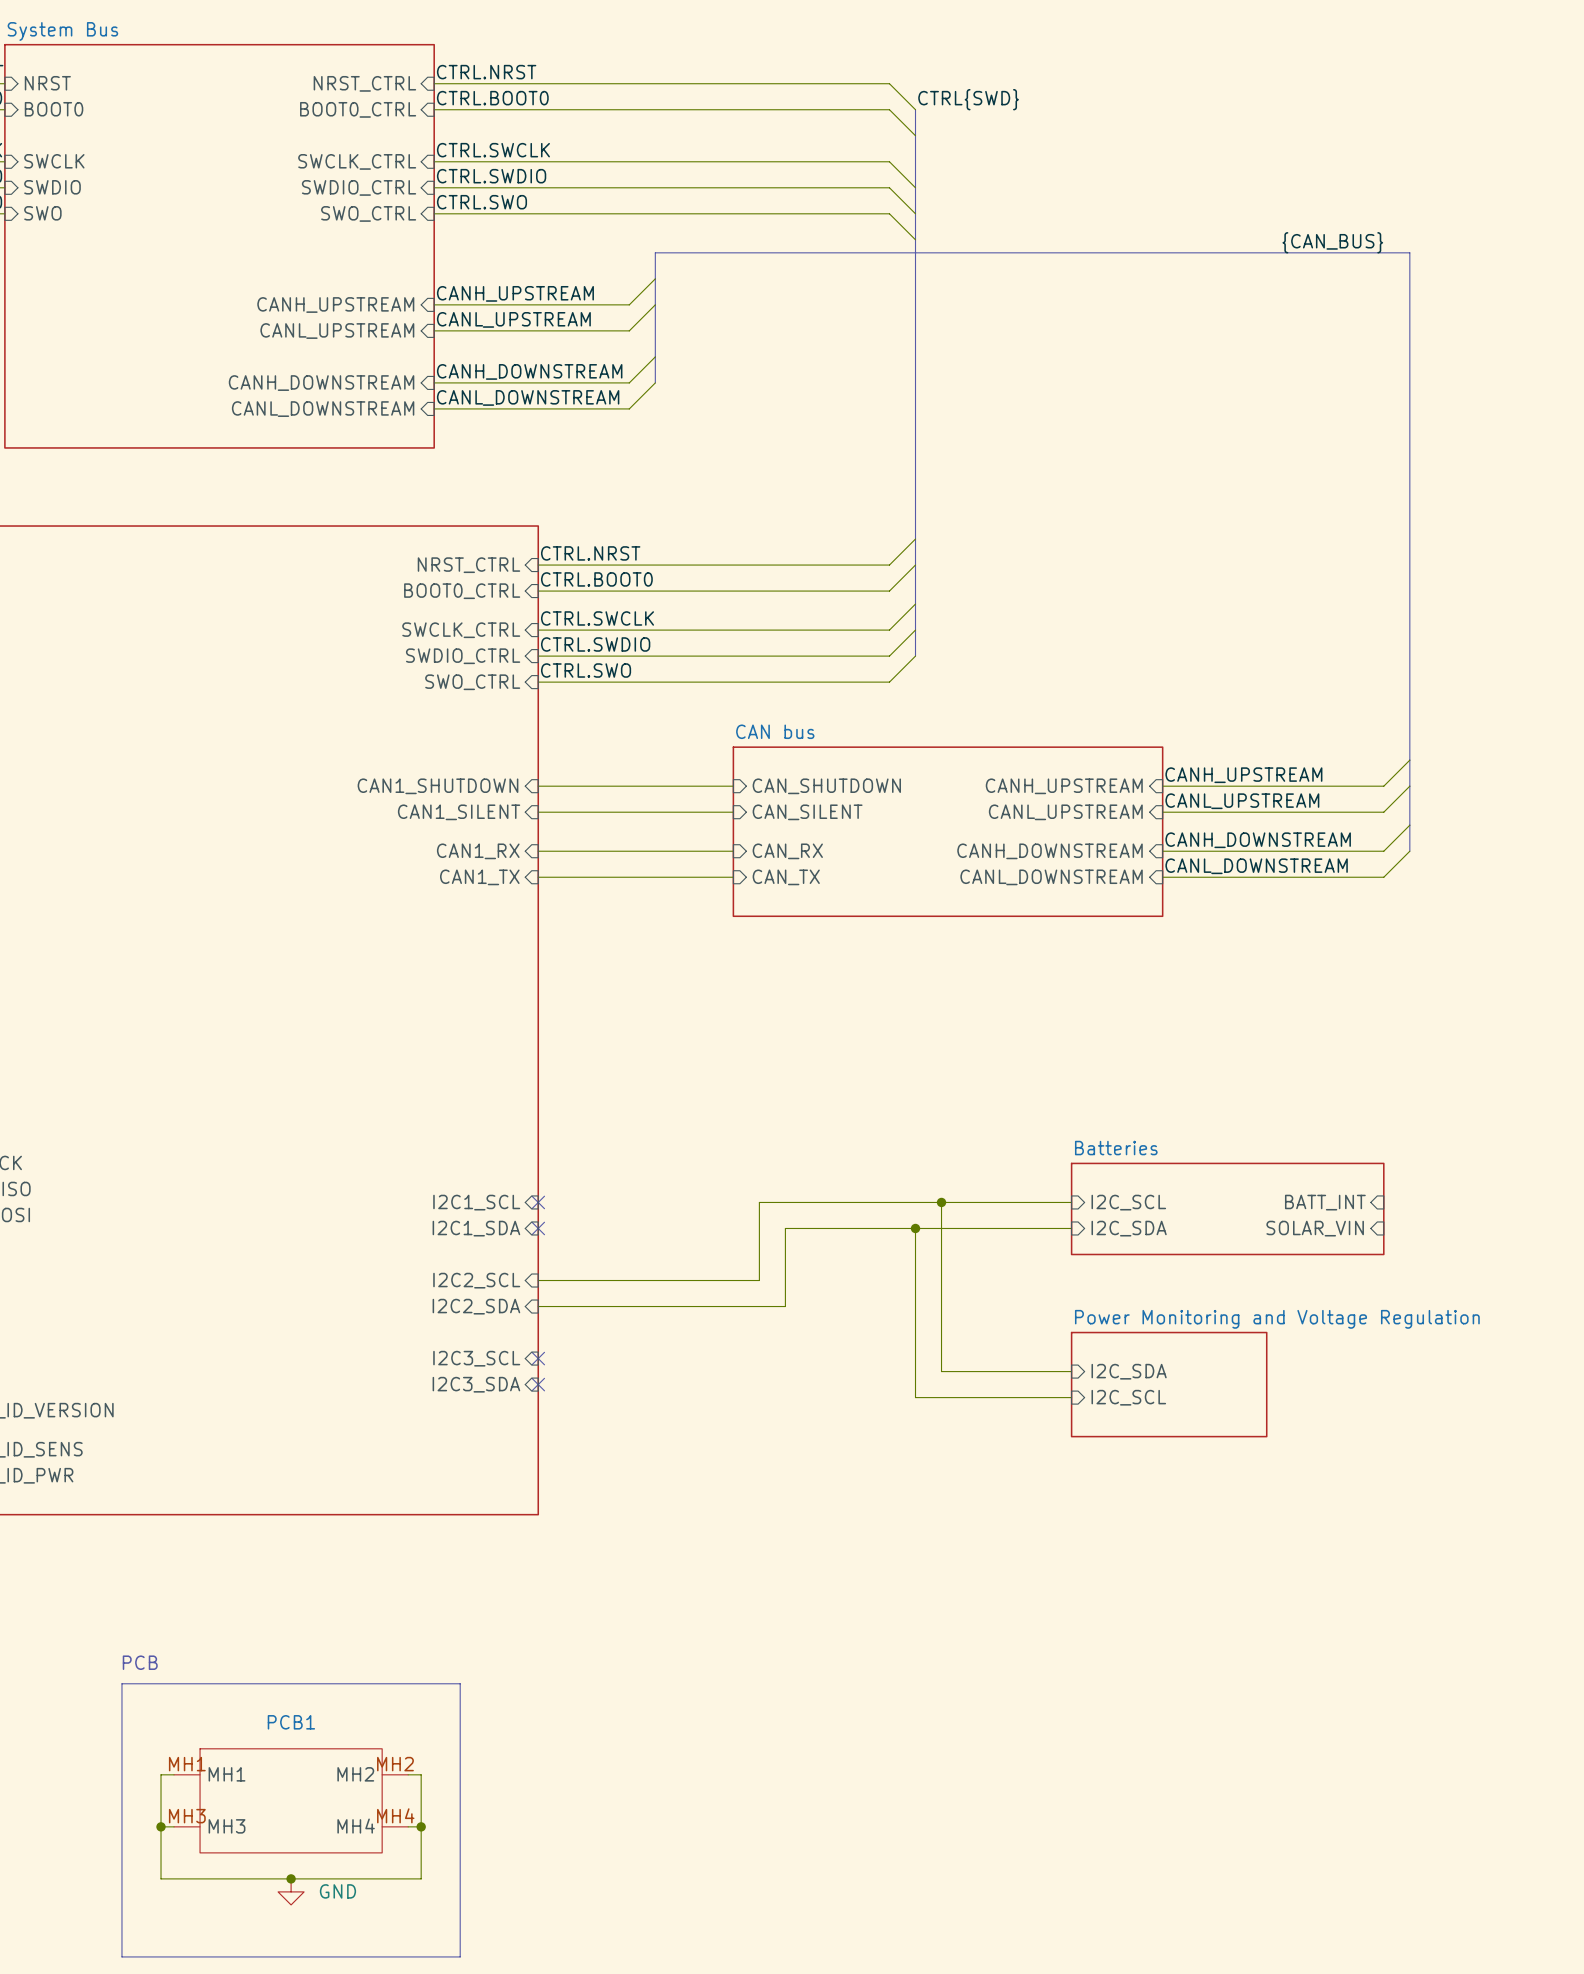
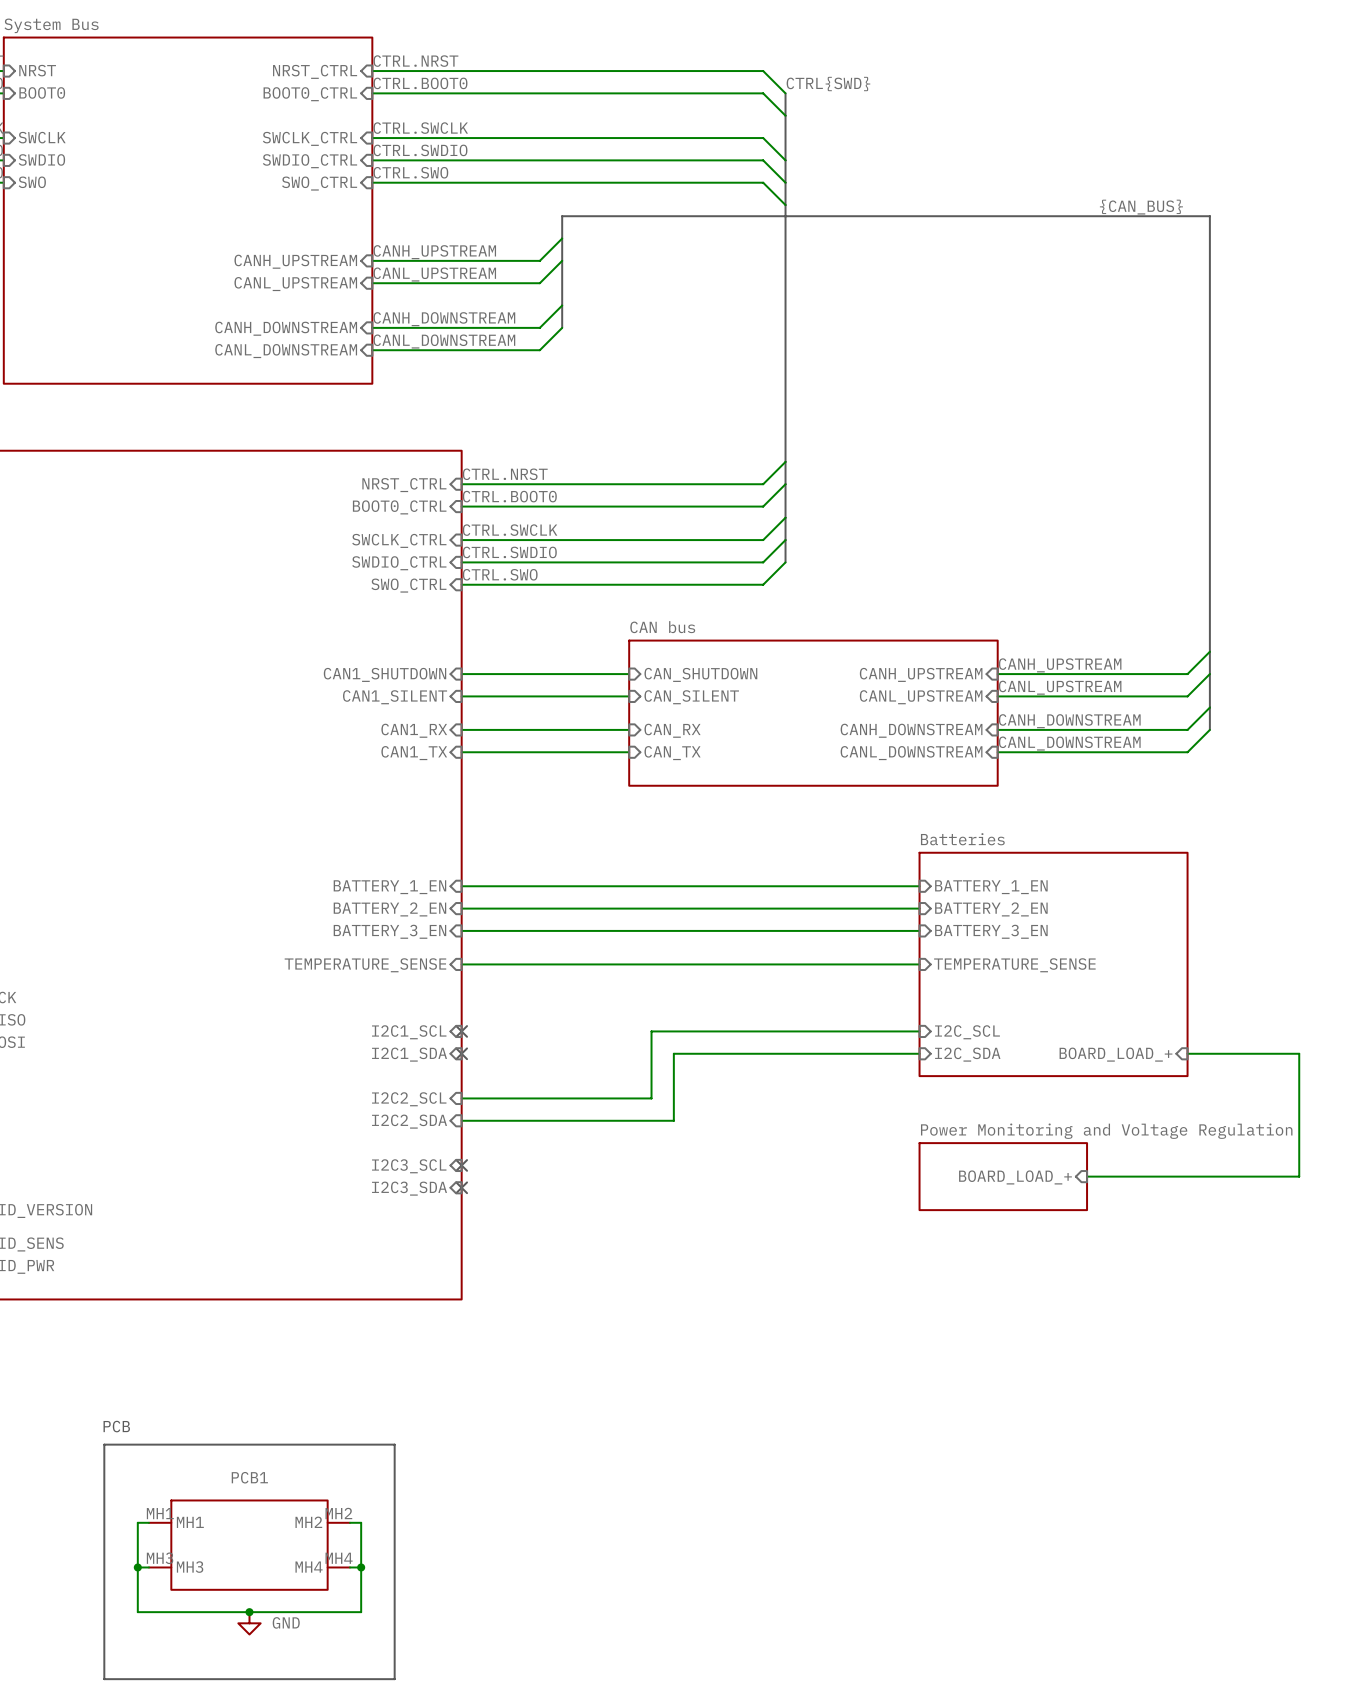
sheet pin: none -> BATTERY_1_EN (389, 887)
wire: none -> (461, 886) (919, 886)
sheet pin: none -> BATTERY_1_EN (991, 887)
sheet pin: none -> BATTERY_2_EN (389, 909)
wire: none -> (461, 908) (919, 908)
sheet pin: none -> BATTERY_2_EN (991, 909)
sheet pin: none -> BATTERY_3_EN (389, 931)
wire: none -> (461, 930) (919, 930)
sheet pin: none -> BATTERY_3_EN (991, 931)
sheet pin: none -> TEMPERATURE_SENSE (365, 965)
wire: none -> (461, 964) (919, 964)
sheet pin: none -> TEMPERATURE_SENSE (1014, 965)
sheet Batteries: none -> (1053, 964)
wire: (941, 1202) (941, 1371) (1071, 1371) -> none
junction: (941, 1202) -> none
sheet pin: BATT_INT (1325, 1202) -> none
sheet Batteries: (1227, 1208) -> none
wire: (915, 1228) (915, 1397) (1071, 1397) -> none
junction: (915, 1228) -> none
sheet pin: SOLAR_VIN (1315, 1228) -> BOARD_LOAD_+ (1115, 1054)
wire: none -> (1187, 1053) (1299, 1053) (1299, 1176) (1087, 1176)
sheet pin: I2C_SDA (1129, 1371) -> none
sheet Power Monitoring and Voltage Regulation: none -> (1003, 1176)
sheet pin: none -> BOARD_LOAD_+ (1015, 1177)
sheet Power Monitoring and Voltage Regulation: (1169, 1384) -> none
sheet pin: I2C_SCL (1128, 1397) -> none

